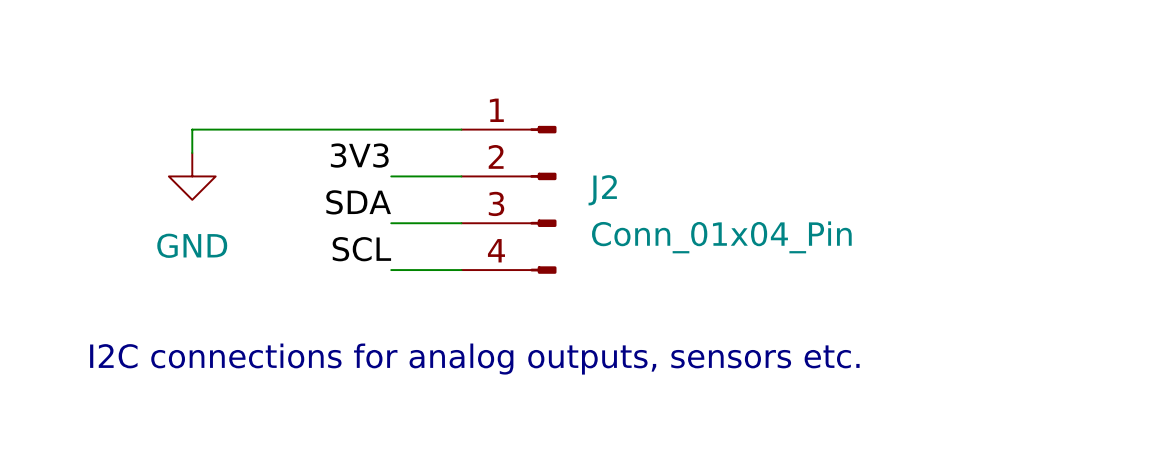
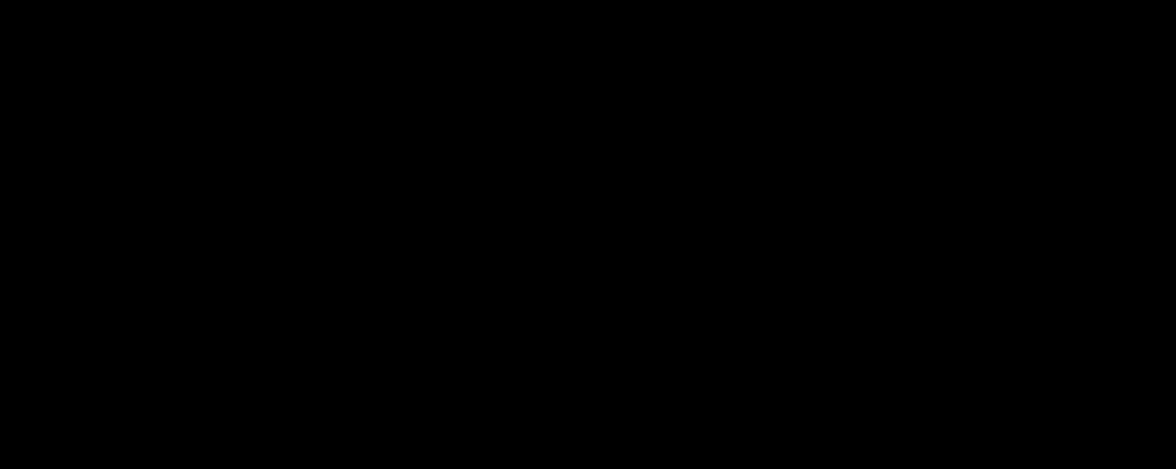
wire: (461, 129) (192, 129) (192, 153) -> none
label: 3V3 (359, 155) -> none
power symbol: GND (192, 176) -> none
wire: (391, 176) (461, 176) -> none
J2: Conn_01x04_Pin (508, 199) -> none
label: SDA (358, 202) -> none
wire: (391, 223) (461, 223) -> none
label: SCL (361, 249) -> none
wire: (391, 270) (461, 270) -> none
text: I2C connections for analog outputs, sensors etc. (474, 359) -> none

